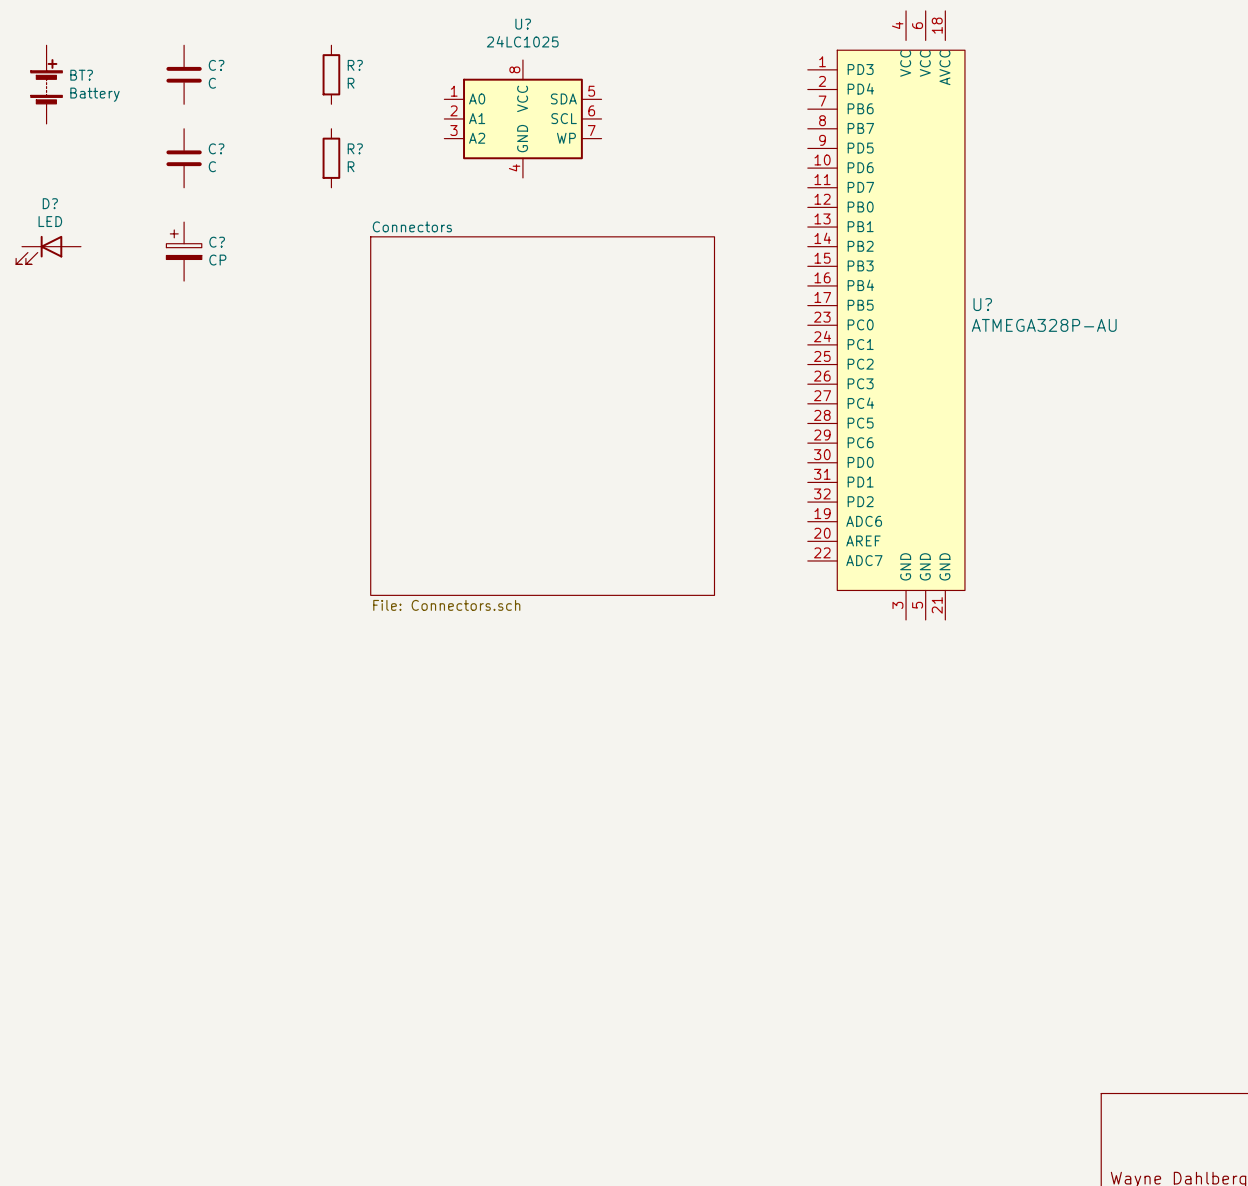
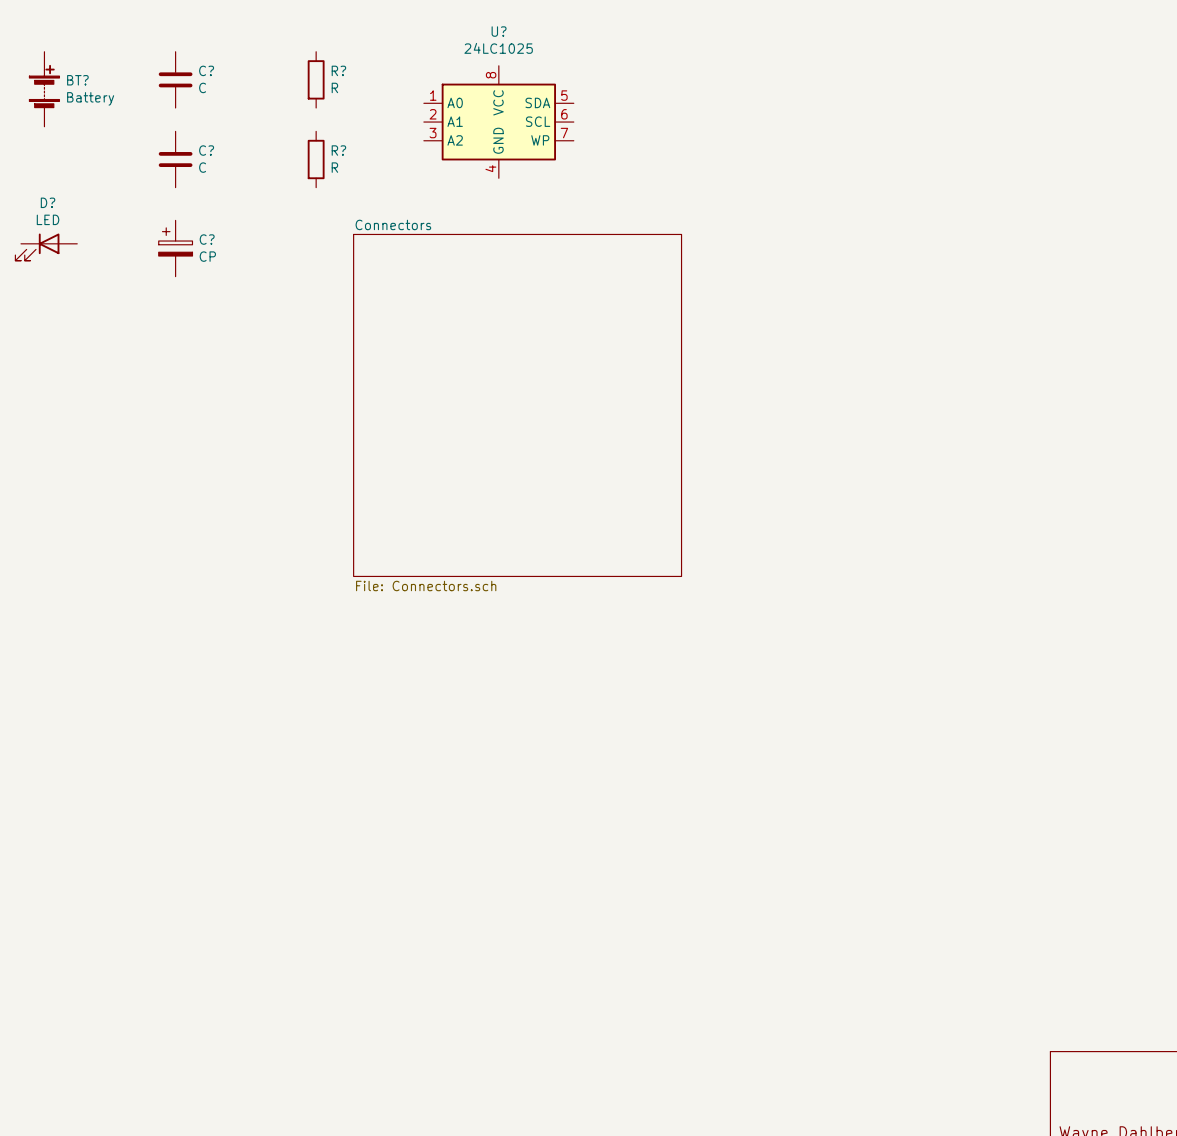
U?: ATMEGA328P-AU (886, 315) -> none

